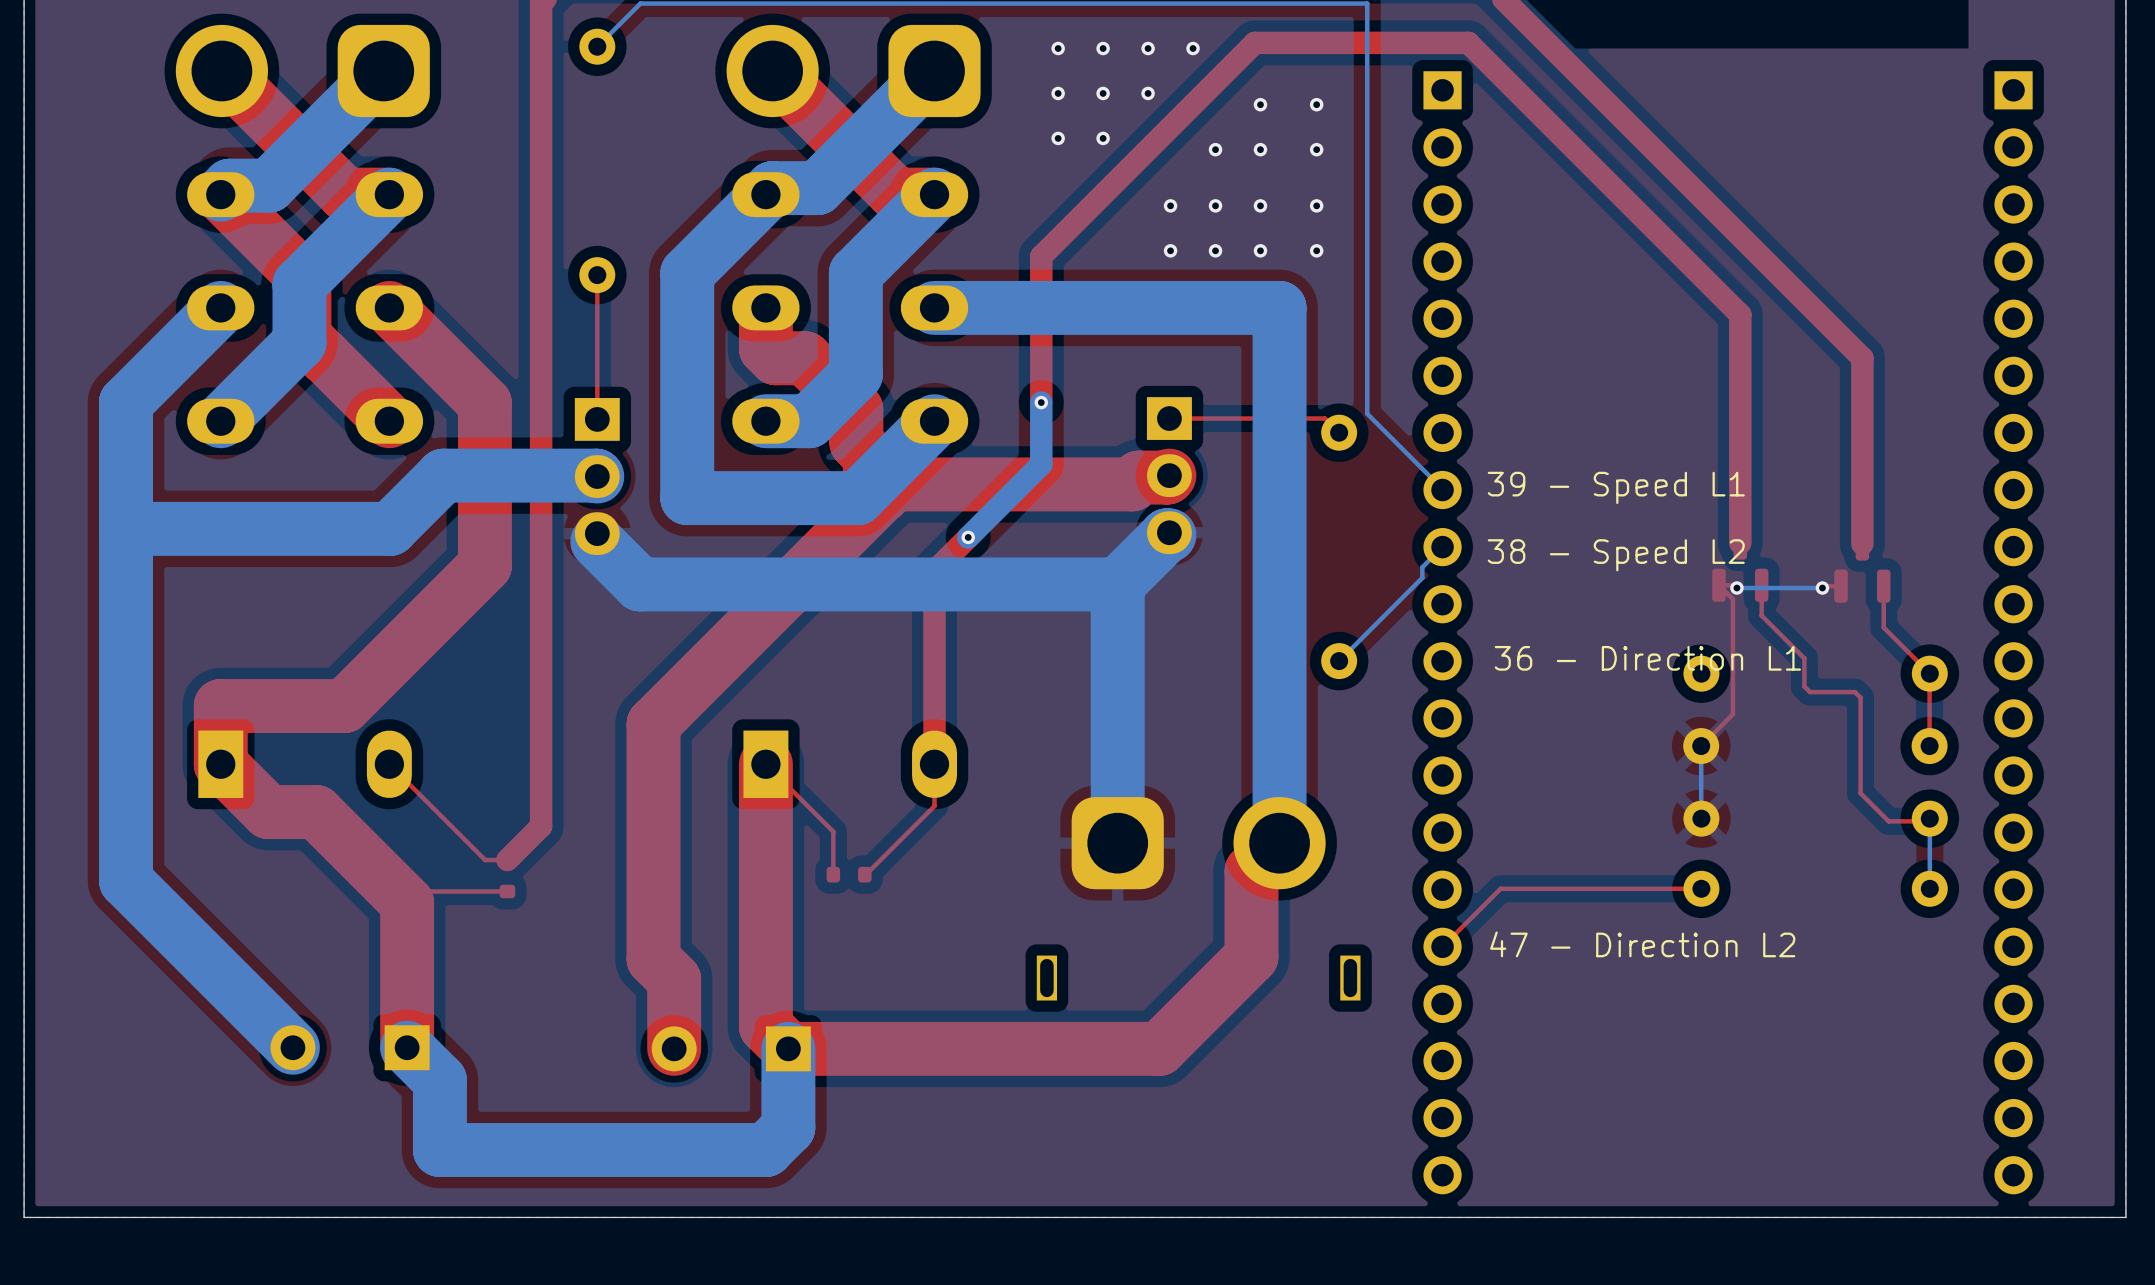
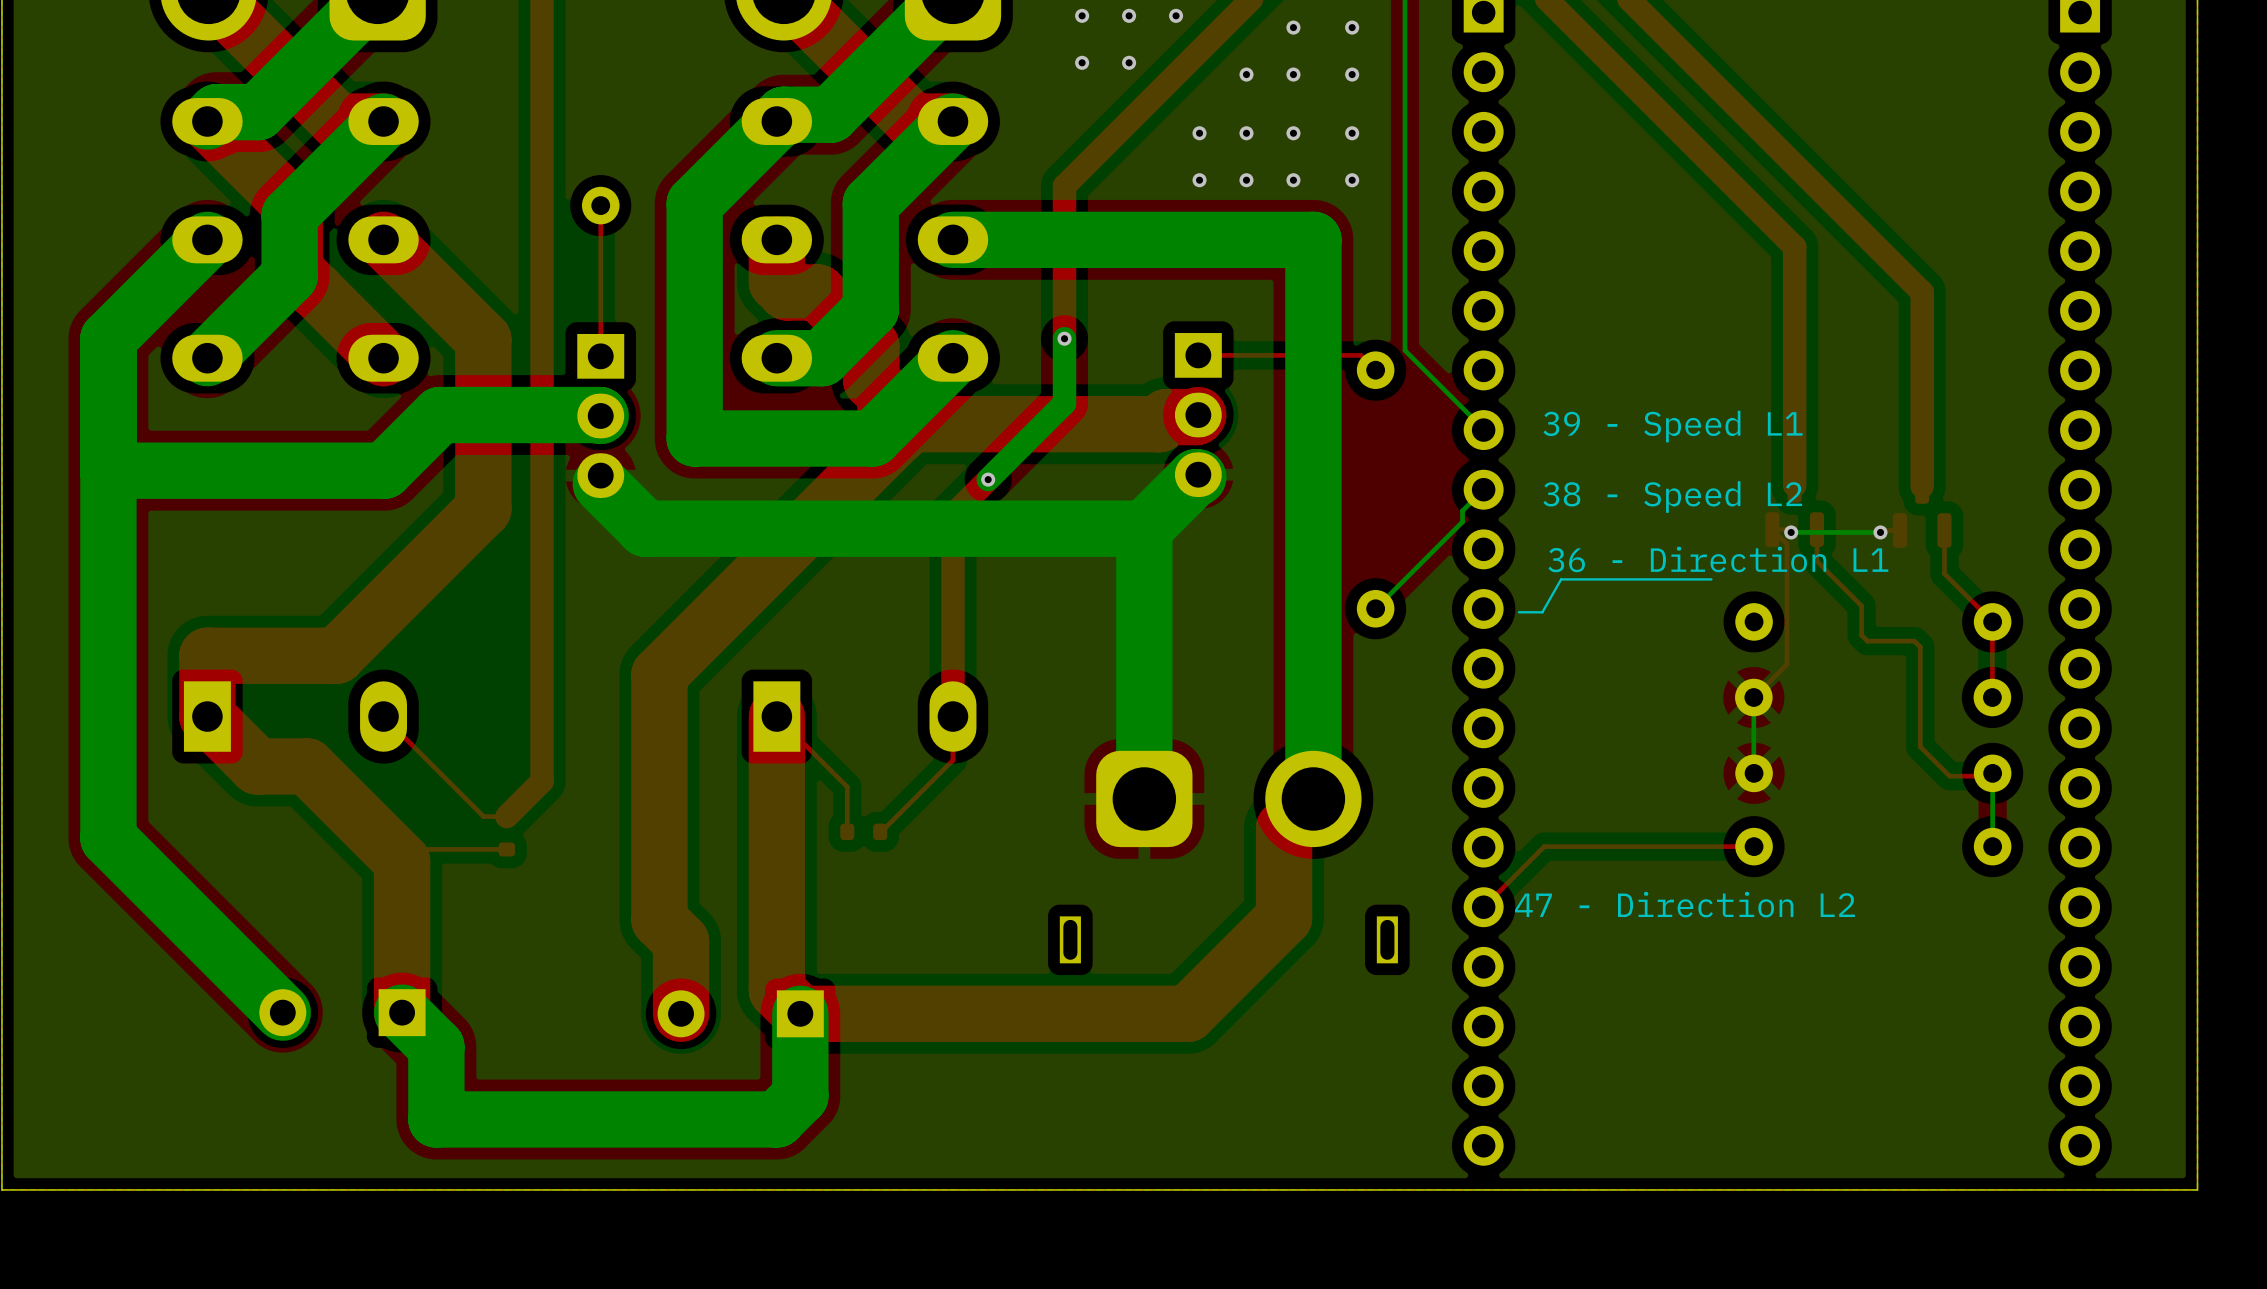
line: none -> (1711, 579) (1561, 579) (1542, 612) (1518, 612)
text position: 36 - Direction L1 (1647, 658) -> 36 - Direction L1 (1718, 559)

